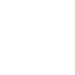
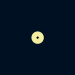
part: none -> (37, 37)

